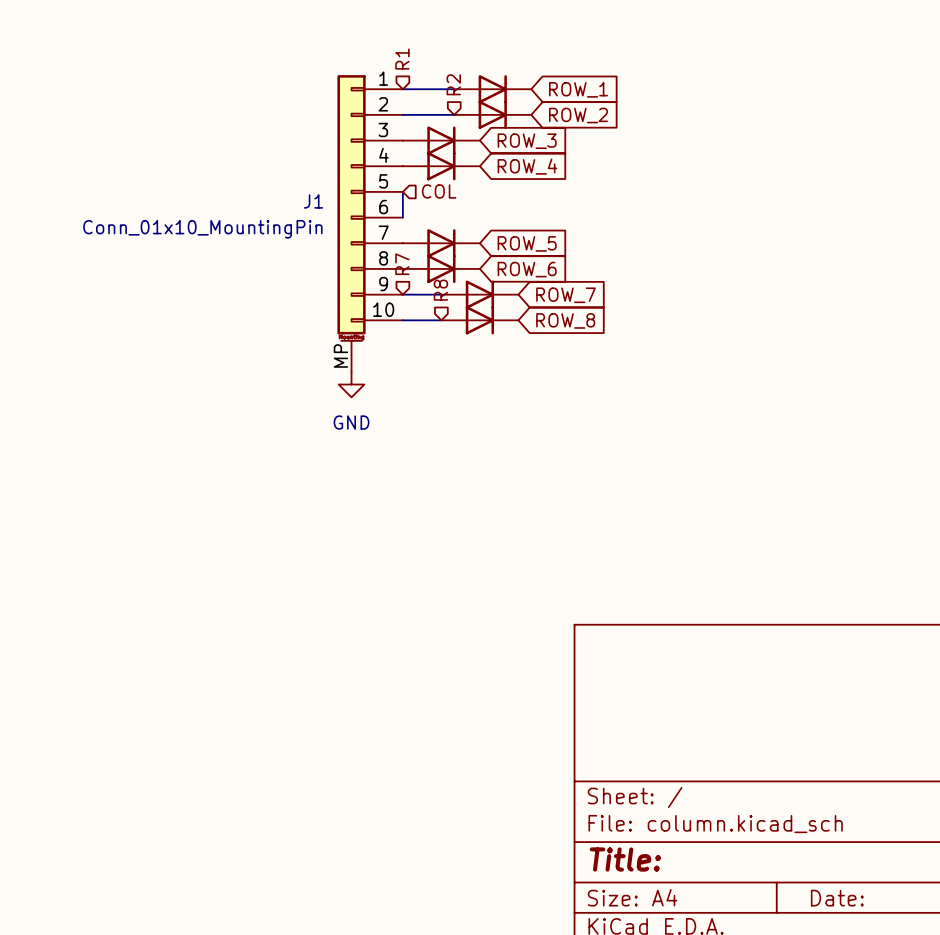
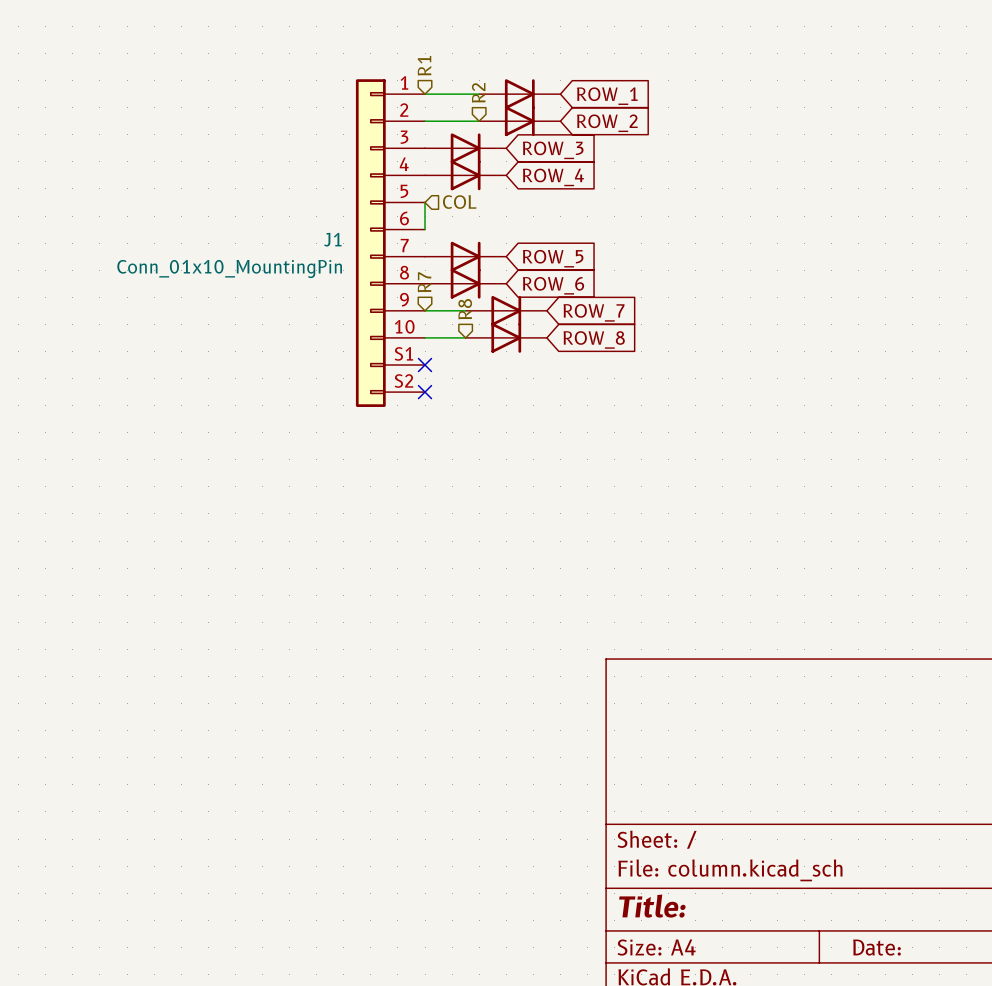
J1 symbol: [337, 75, 403, 372] -> [355, 79, 426, 407]
no-connect mark: none -> (425, 365)
no-connect mark: none -> (425, 392)
power symbol: GND (351, 384) -> none

